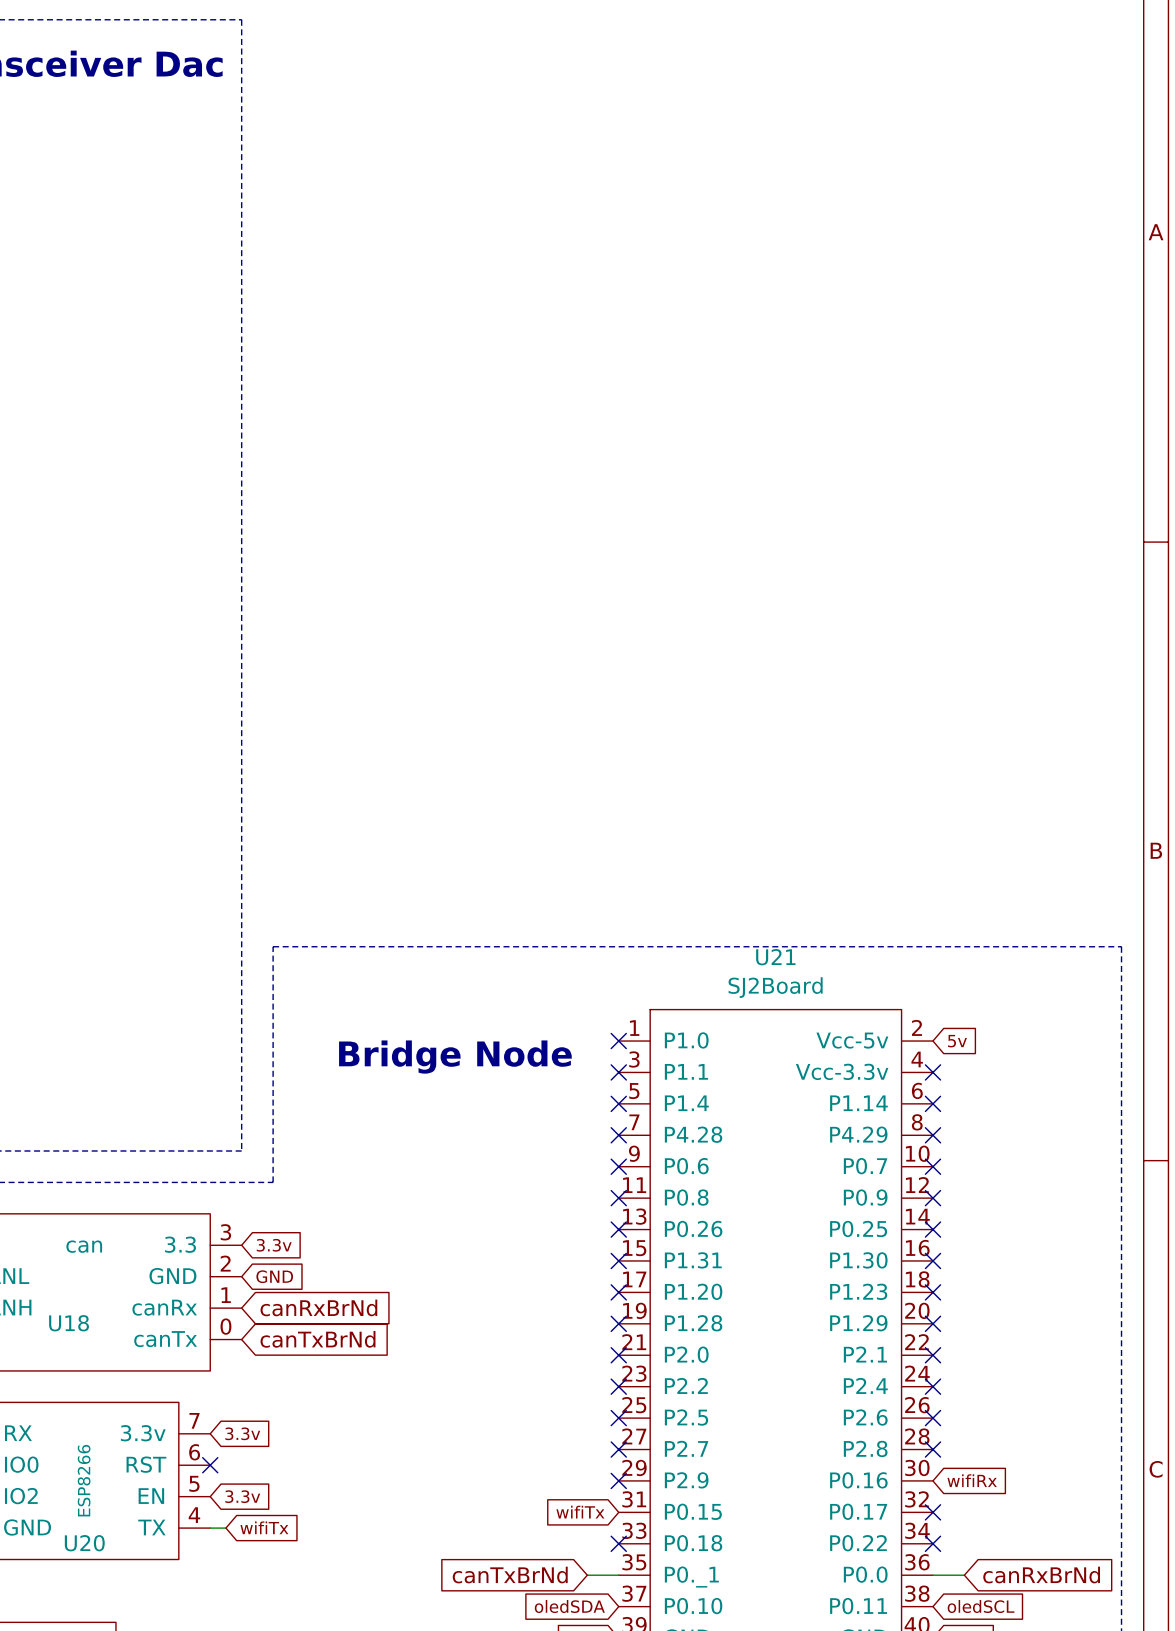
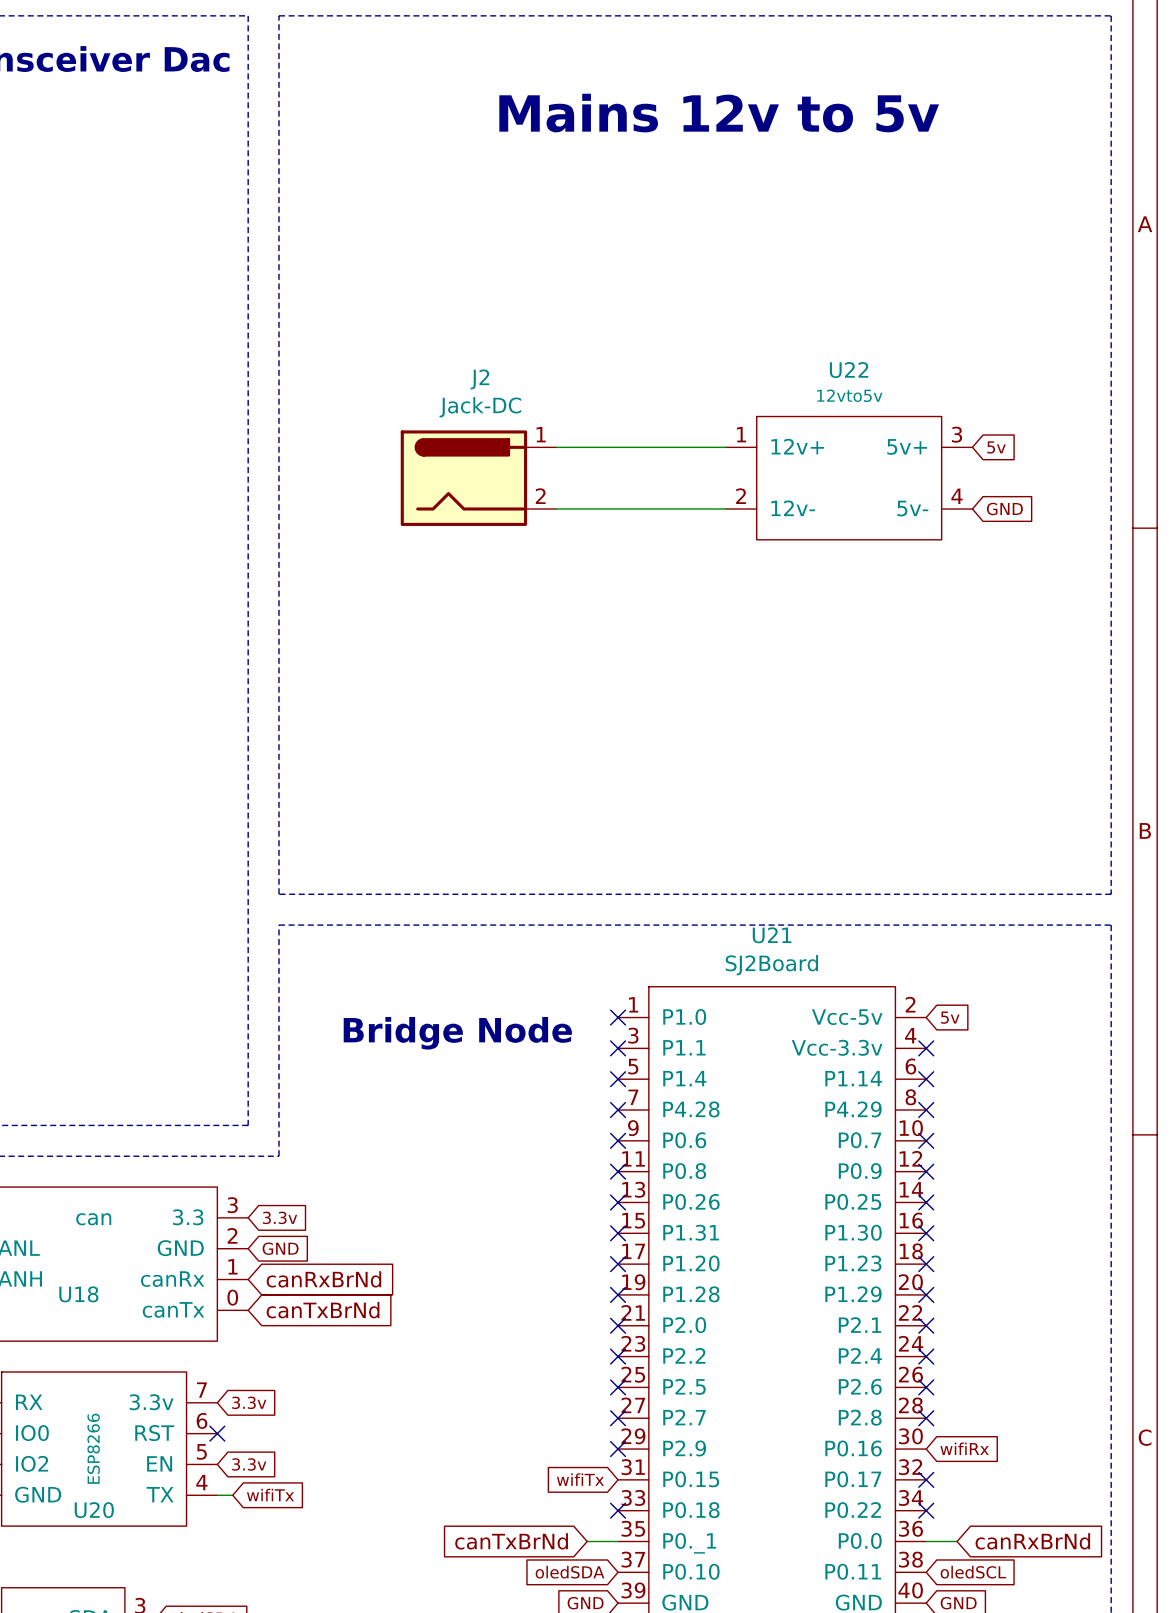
line: none -> (279, 15) (279, 894) (1111, 894) (1111, 15) (279, 15)
text: none -> Mains 12v to 5v (719, 113)
wire: none -> (556, 447) (725, 447)
global label: none -> 5v (996, 447)
J2: none -> Jack-DC (478, 478)
U22: none -> 12vto5v (849, 478)
wire: none -> (556, 508) (725, 508)
global label: none -> GND (1004, 509)

